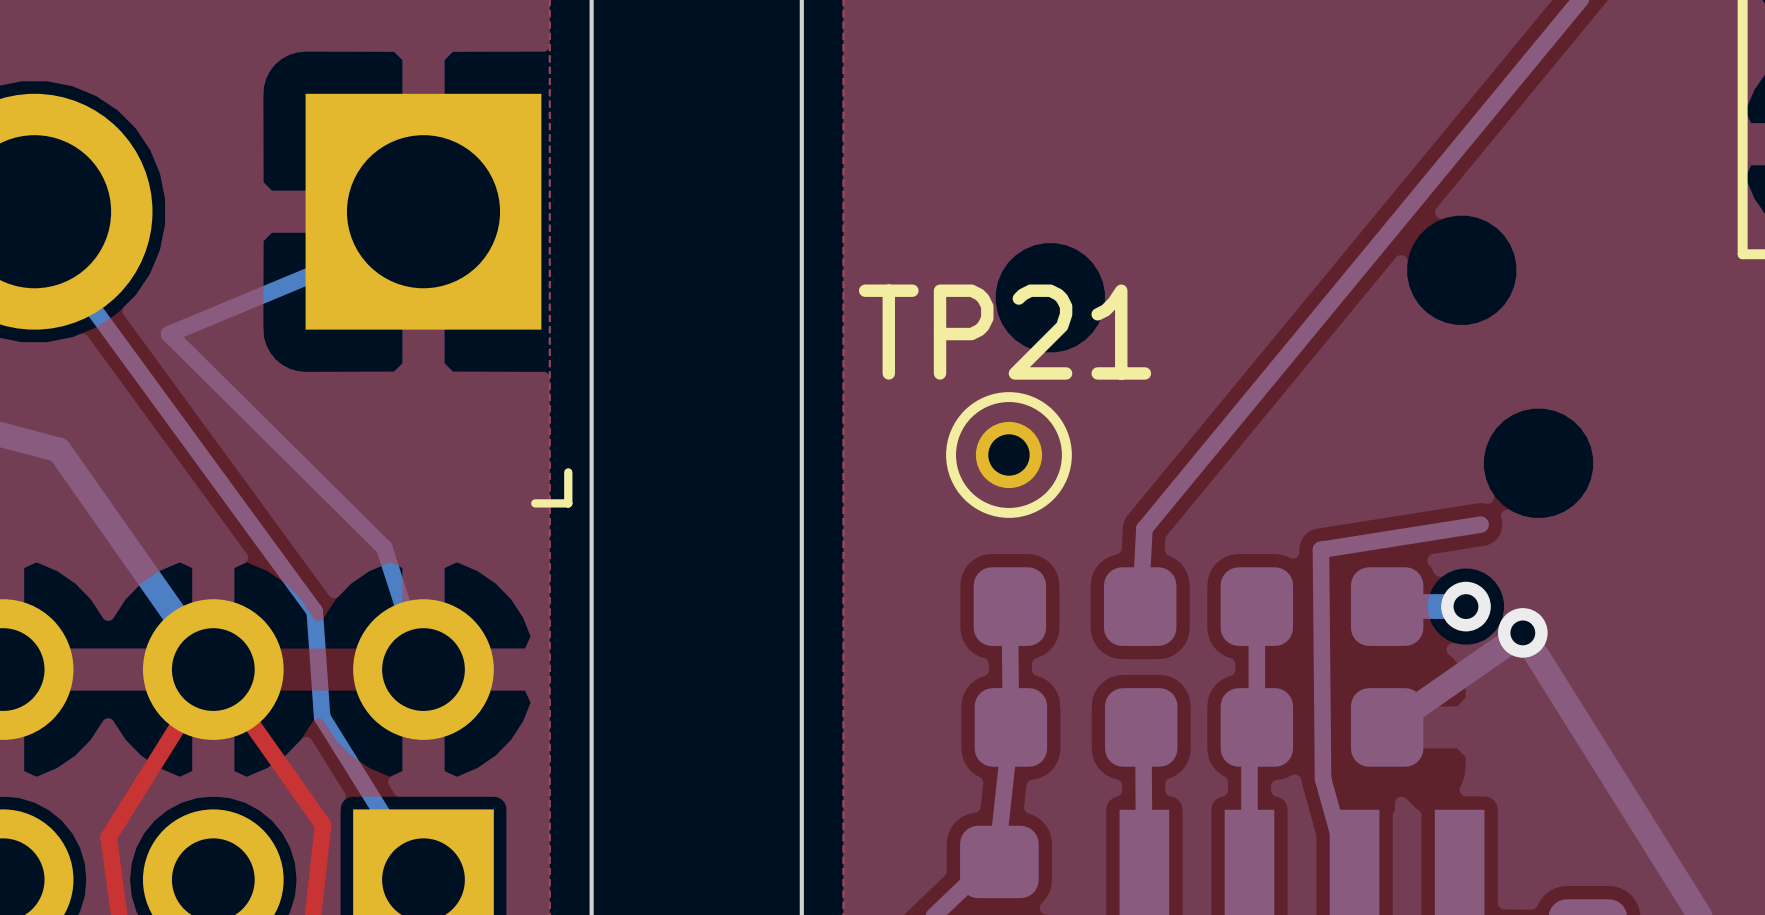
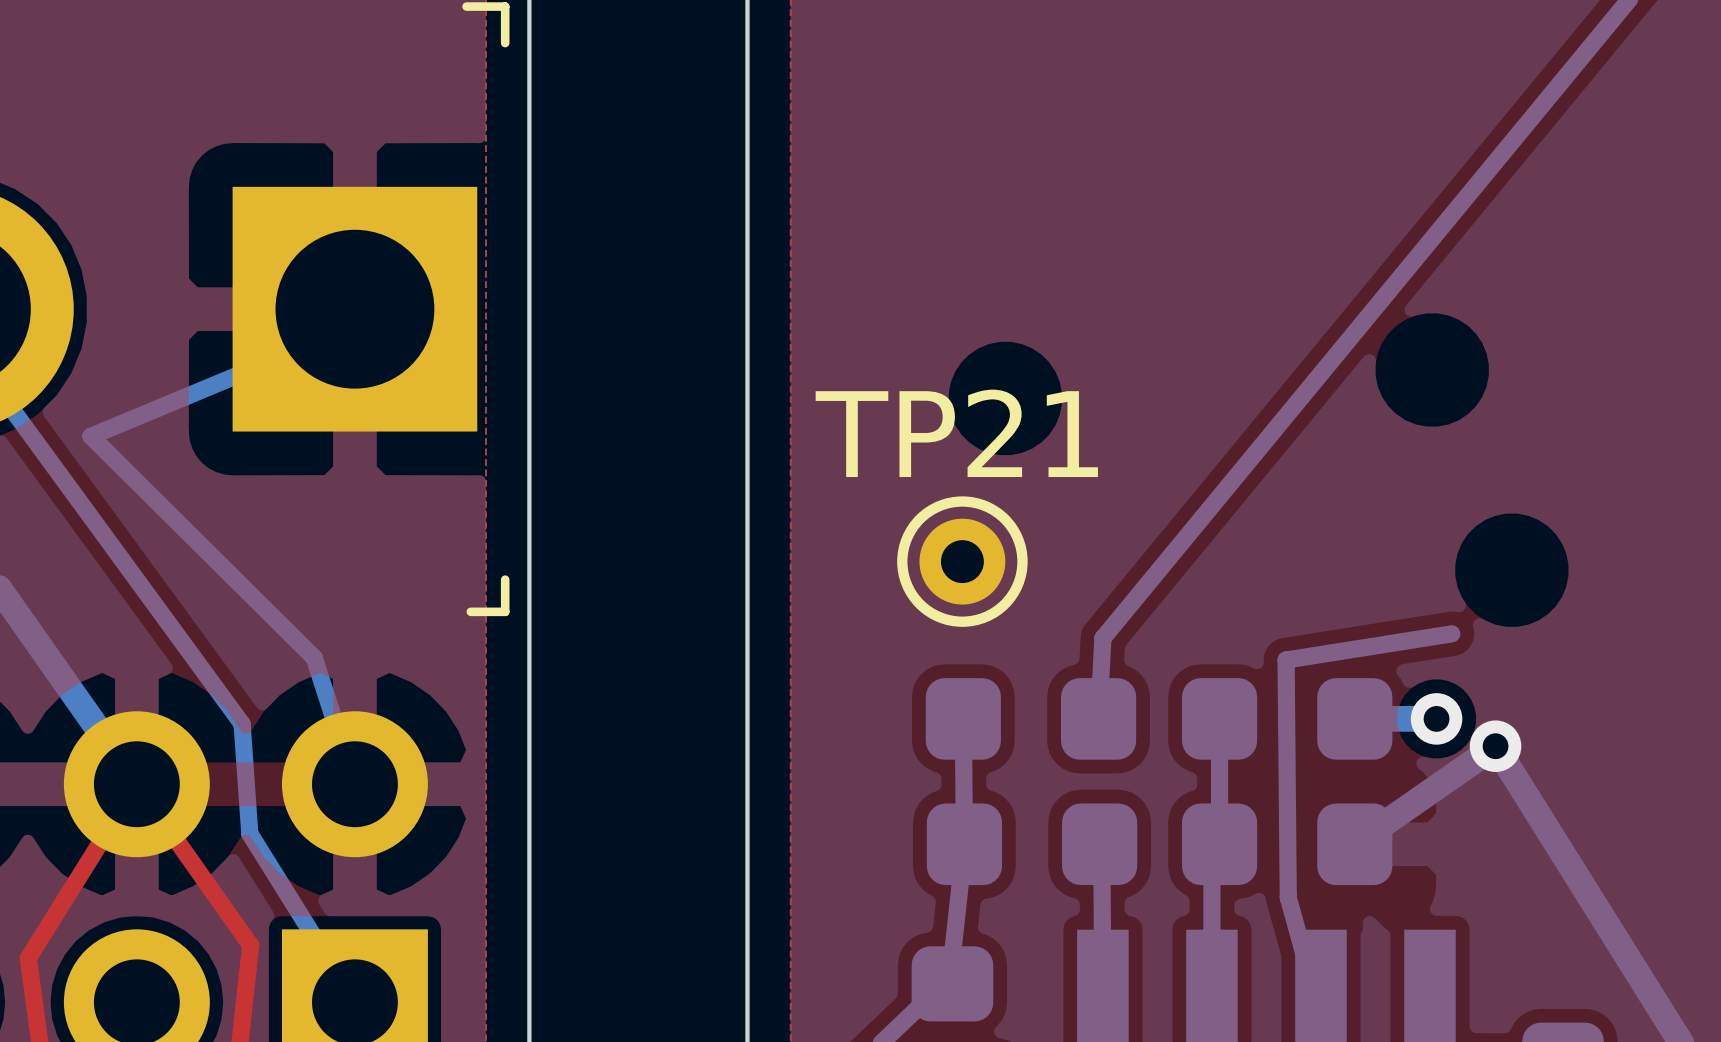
TP21 footprint: [946, 392, 1072, 518] -> [897, 496, 1028, 627]

